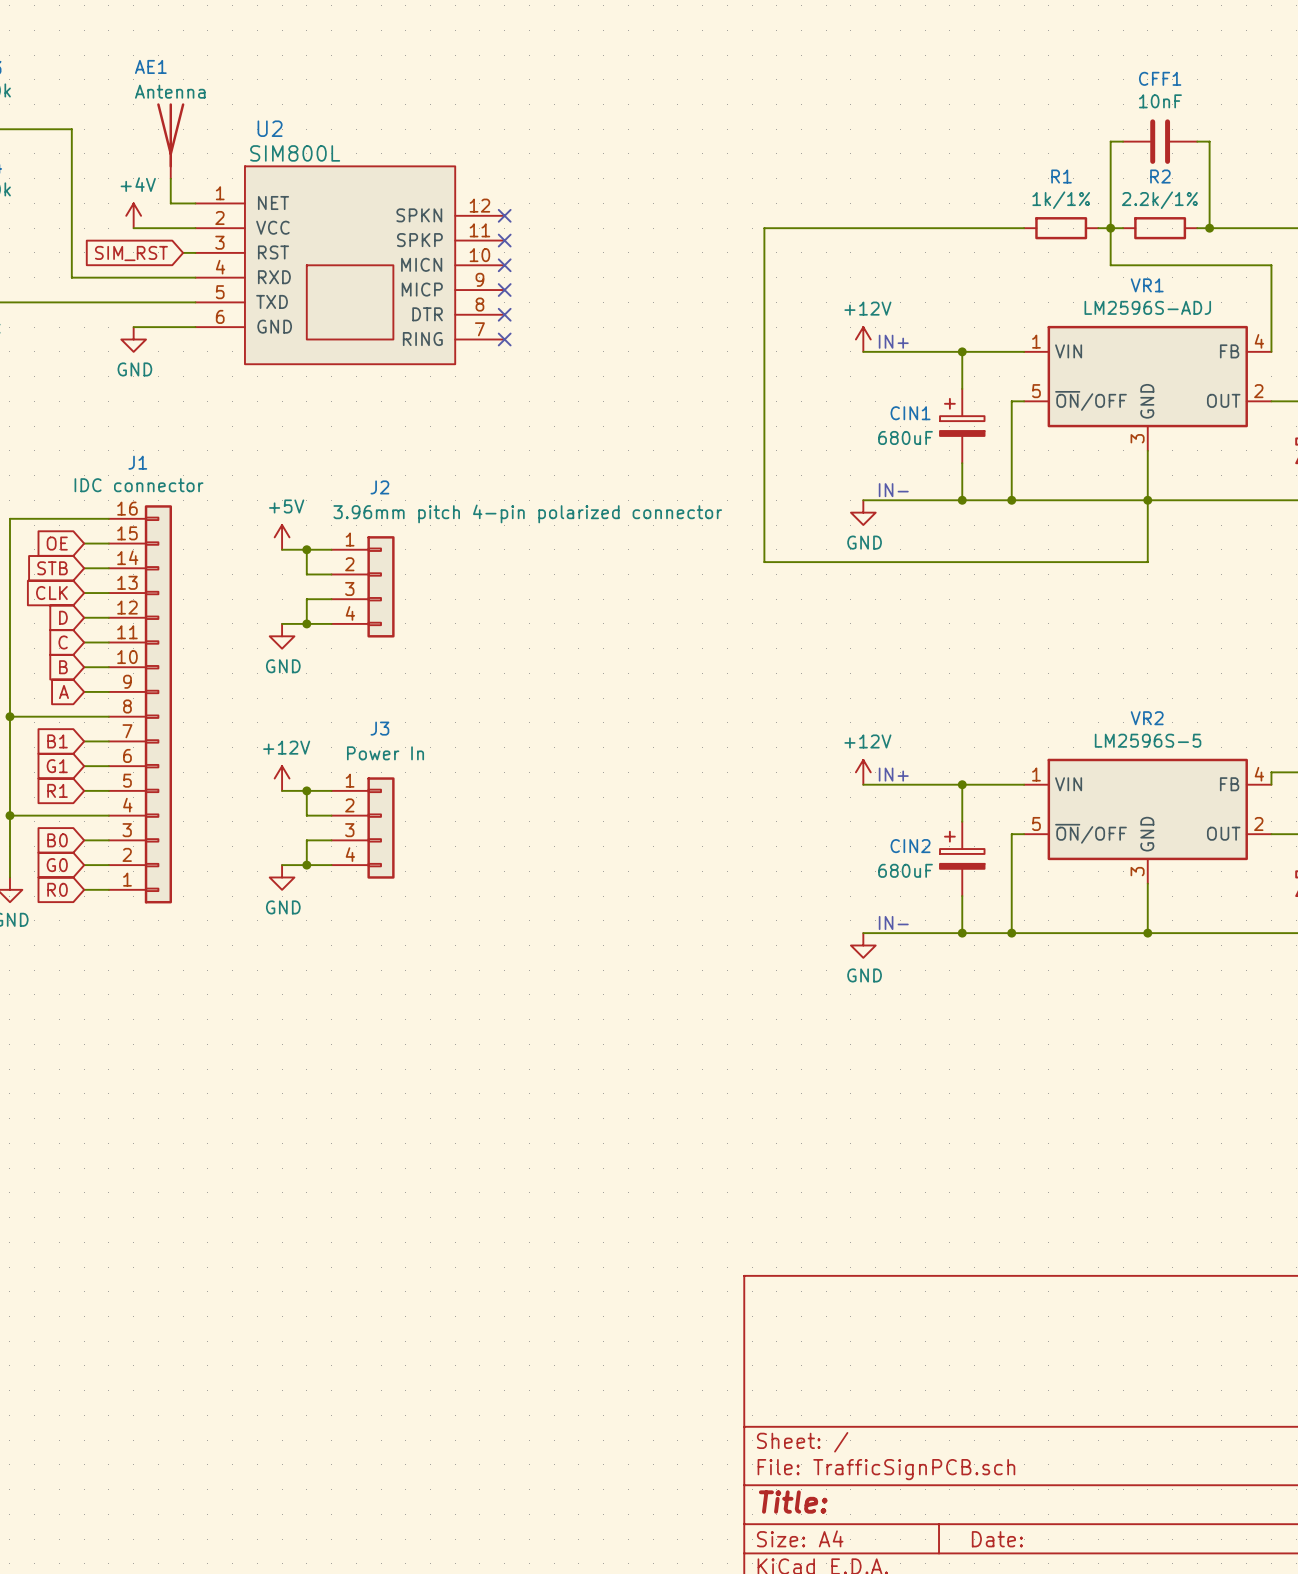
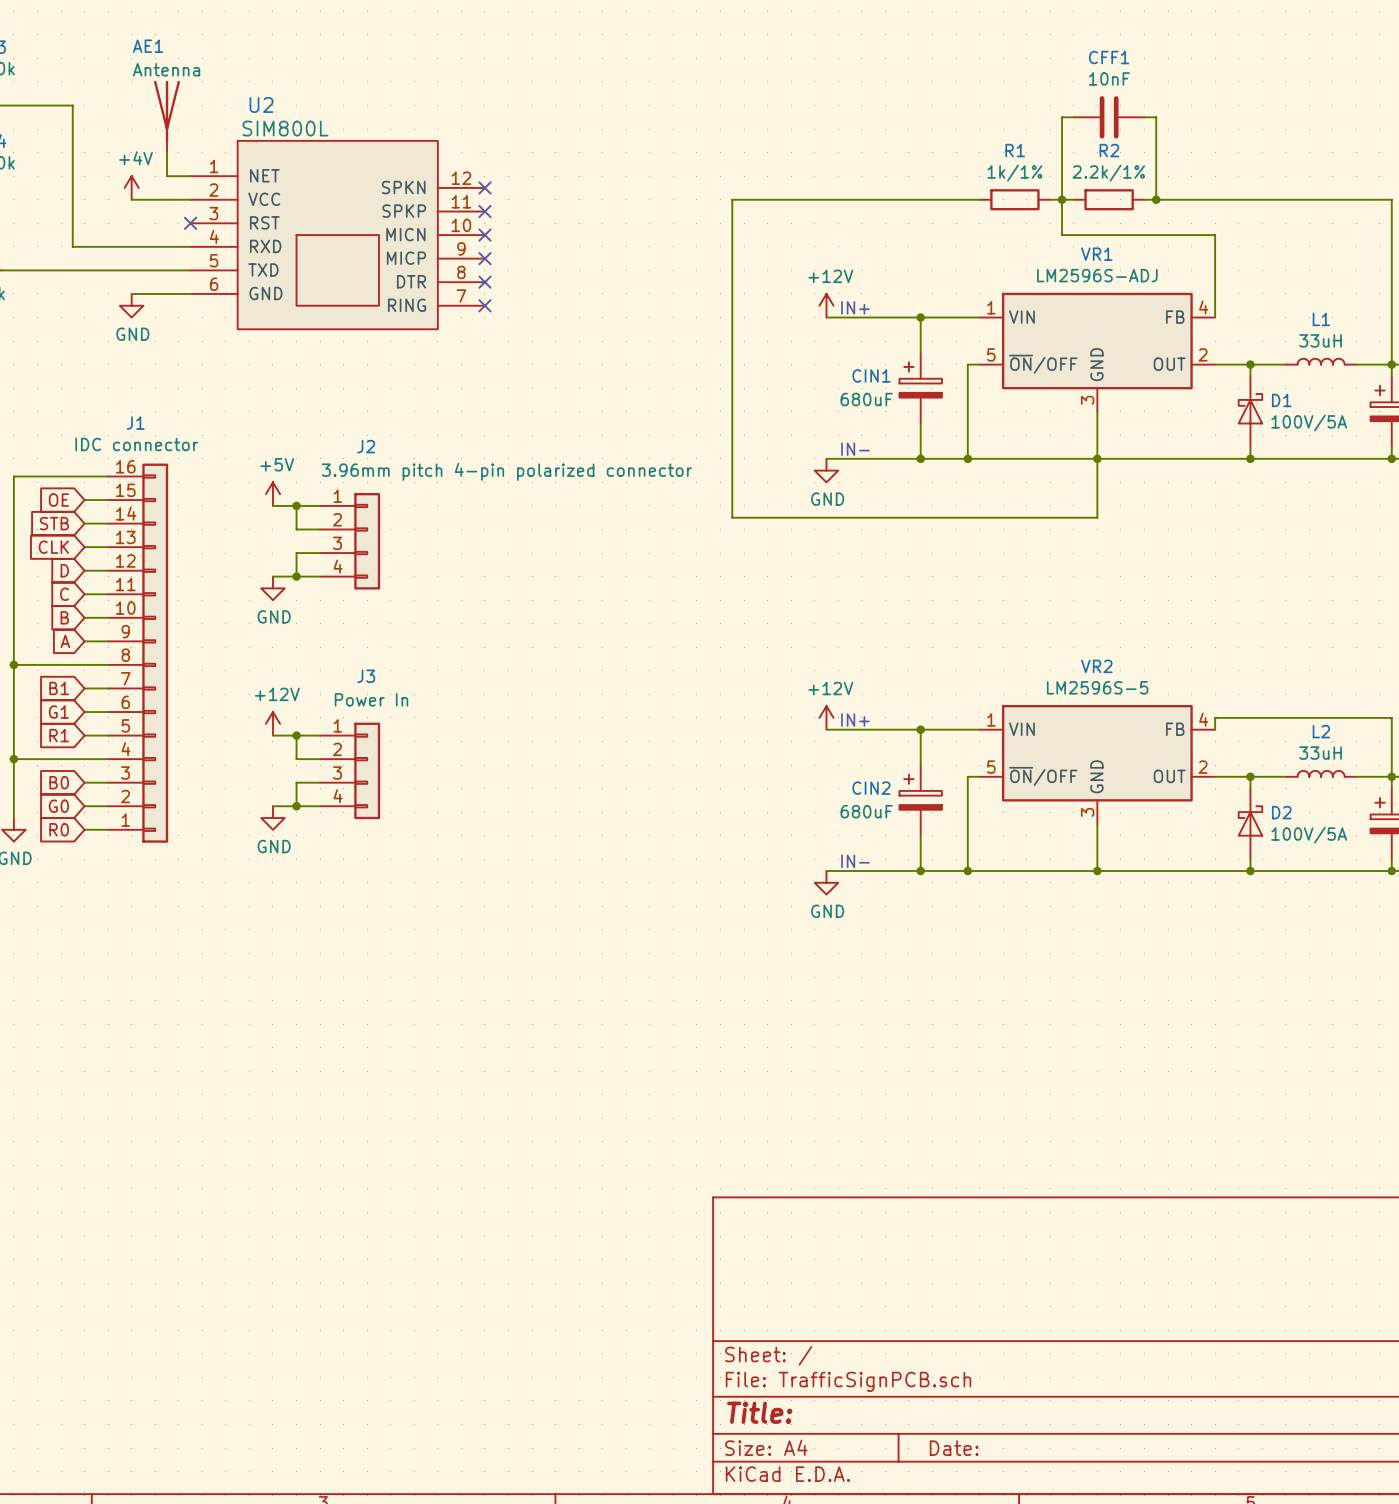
wire: (183, 252) (195, 252) -> none
no-connect mark: none -> (190, 223)
global label: SIM_RST (131, 253) -> none

